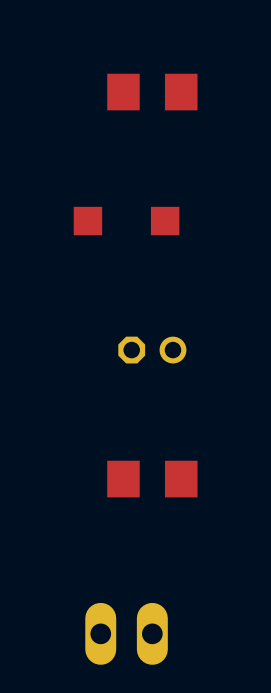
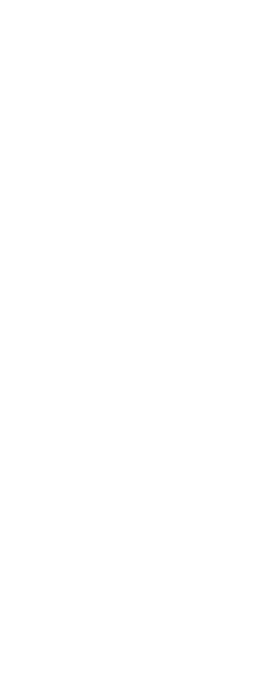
part: (152, 92) -> none
part: (126, 221) -> none
part: (152, 350) -> none
part: (152, 479) -> none
part: (126, 633) -> none

